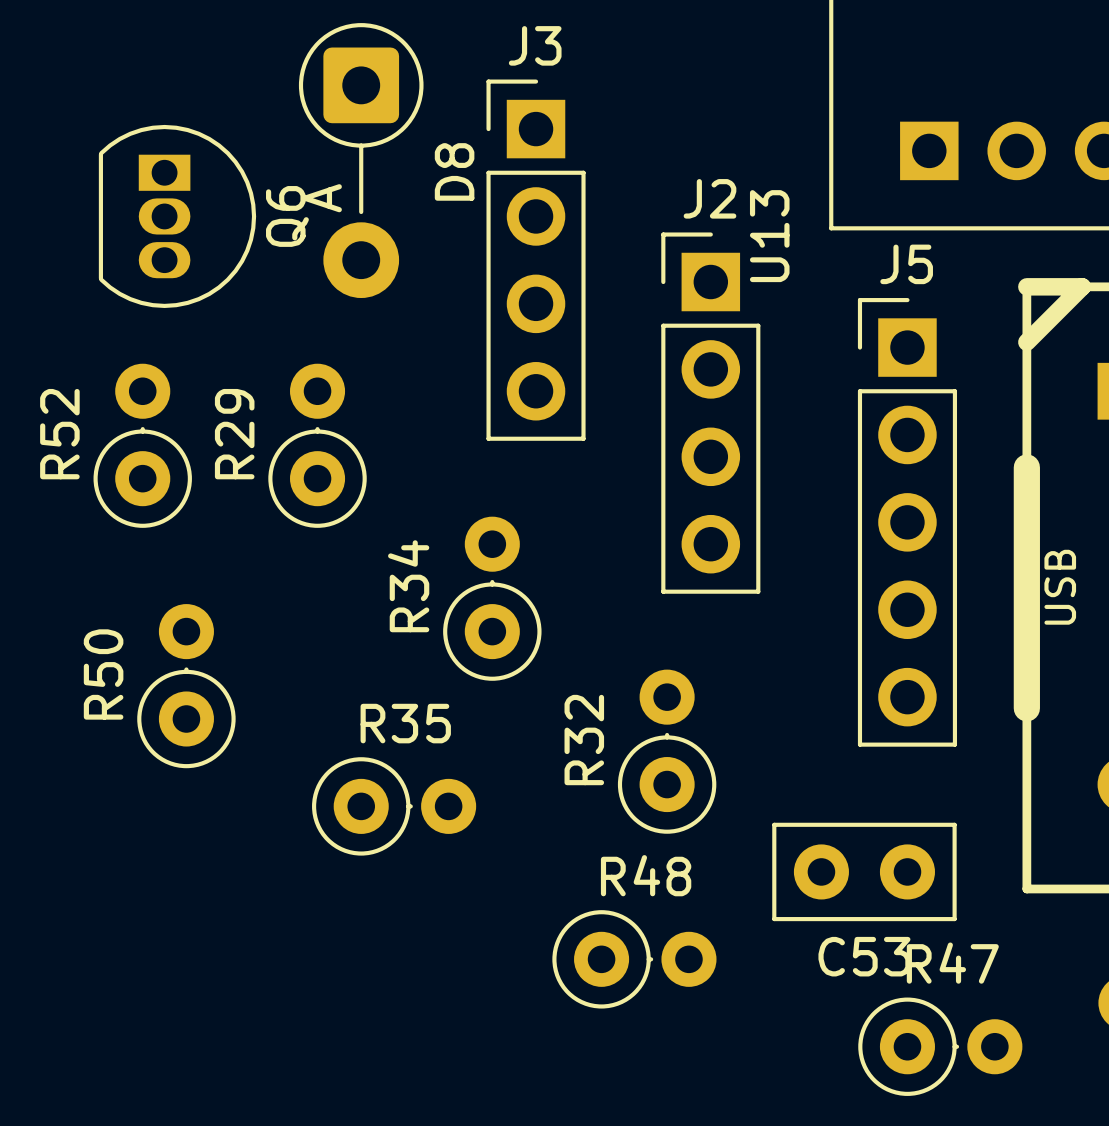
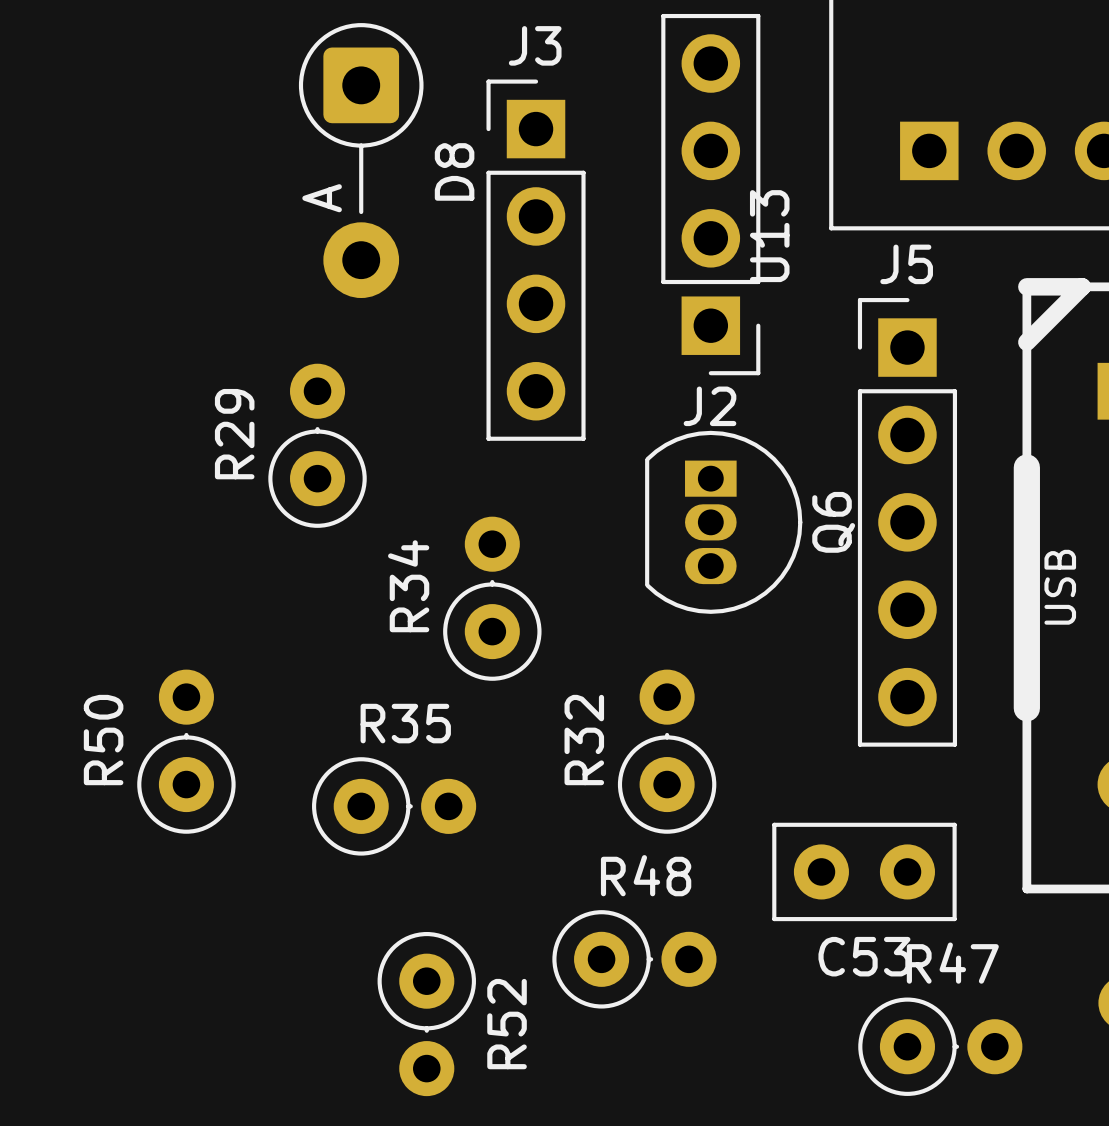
Q6 position: (177, 216) -> (723, 522)
J2 rotation: 0° (710, 413) -> 180° (710, 194)
J2 position: (710, 413) -> (710, 194)
R52 rotation: 0° (142, 445) -> 180° (426, 1014)
R52 position: (142, 445) -> (426, 1014)
R50 position: (186, 686) -> (186, 751)

